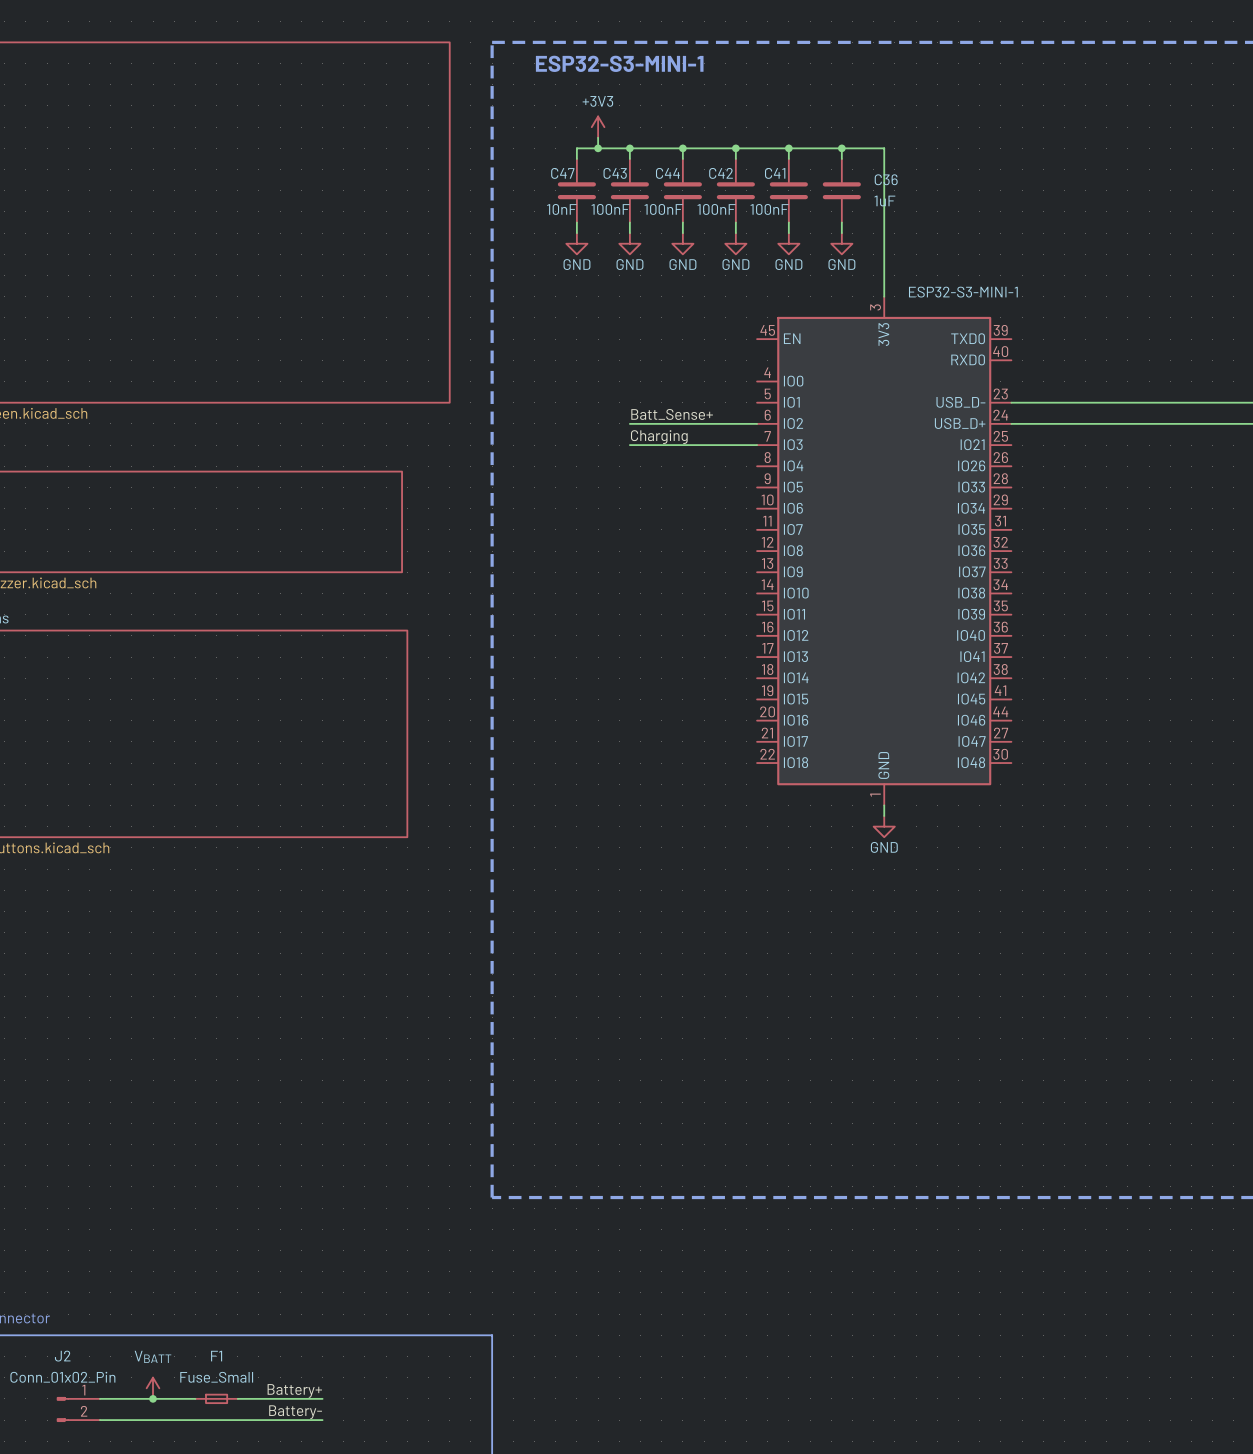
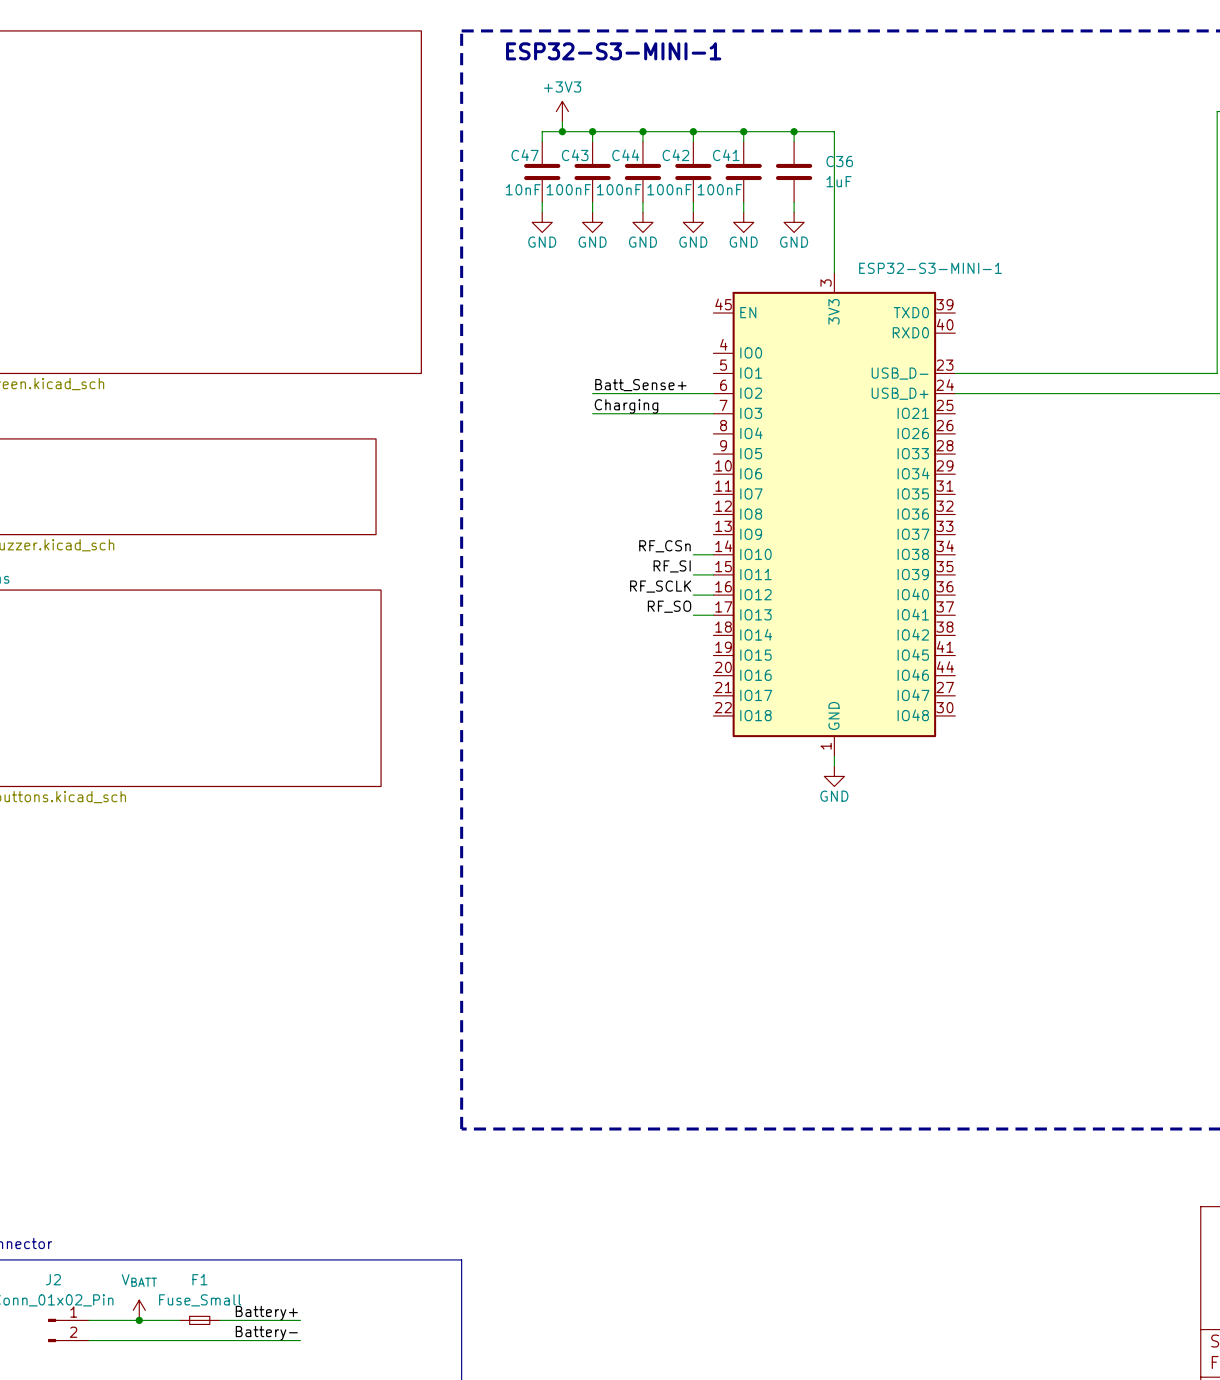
label: none -> RF_CSn (664, 546)
wire: none -> (693, 554) (713, 554)
label: none -> RF_SI (672, 566)
wire: none -> (693, 574) (713, 574)
label: none -> RF_SCLK (660, 586)
wire: none -> (693, 595) (713, 595)
label: none -> RF_SO (669, 606)
wire: none -> (693, 615) (713, 615)

